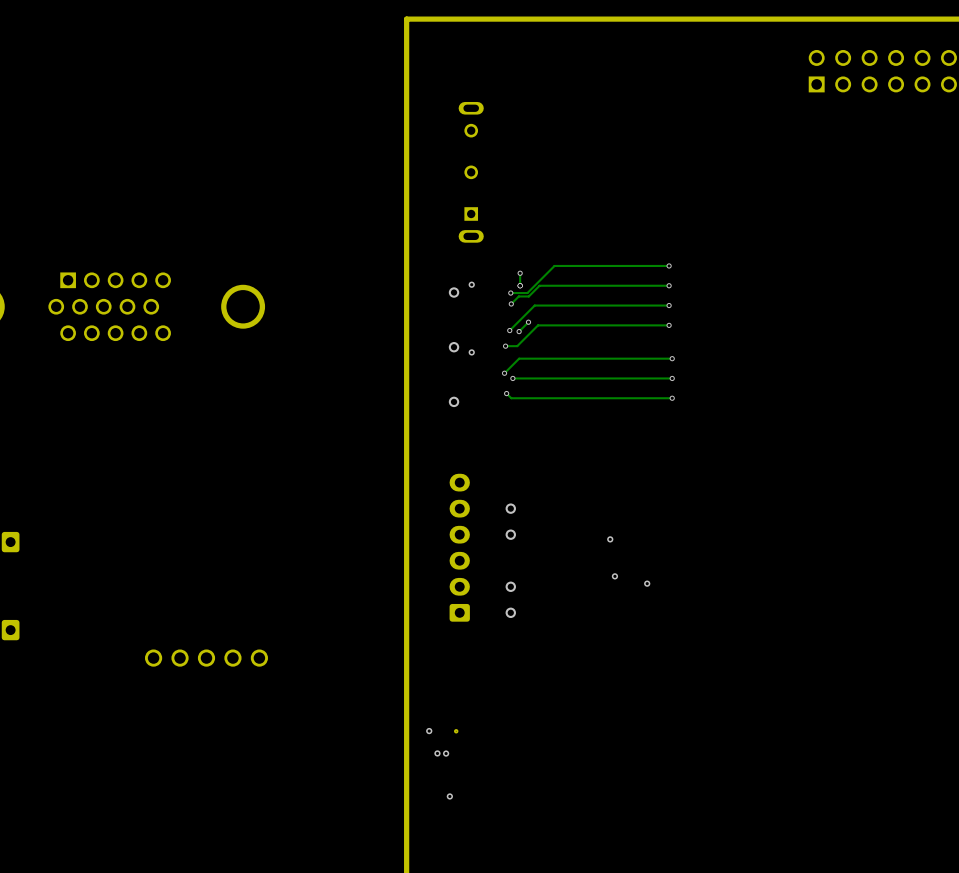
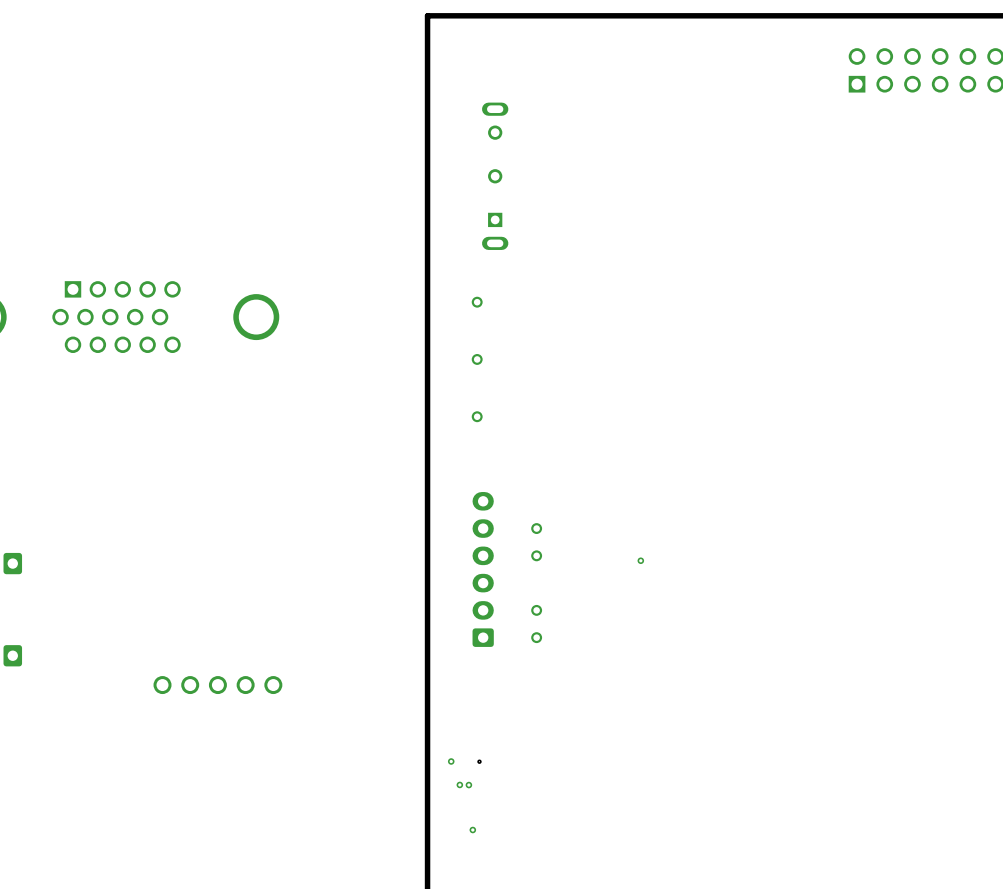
track: (669, 265) (554, 265) (527, 293) (510, 293) -> none
via: (669, 265) -> none
track: (520, 273) (520, 285) -> none
via: (520, 273) -> none
via: (471, 284) -> none
via: (520, 285) -> none
track: (669, 285) (539, 285) (528, 296) (518, 296) (511, 303) -> none
via: (669, 285) -> none
via: (510, 293) -> none
via: (511, 303) -> none
track: (669, 305) (534, 305) (509, 330) -> none
via: (669, 305) -> none
track: (528, 322) (519, 331) -> none
via: (528, 322) -> none
track: (669, 325) (538, 325) (517, 346) (505, 346) -> none
via: (669, 325) -> none
via: (509, 330) -> none
via: (519, 331) -> none
via: (505, 346) -> none
via: (471, 352) -> none
track: (672, 358) (519, 358) (504, 373) -> none
via: (672, 358) -> none
via: (504, 373) -> none
via: (512, 378) -> none
track: (672, 378) (512, 378) -> none
via: (672, 378) -> none
track: (506, 393) (511, 398) (672, 398) -> none
via: (506, 393) -> none
via: (672, 398) -> none
via: (614, 576) -> none
via: (647, 583) -> none

